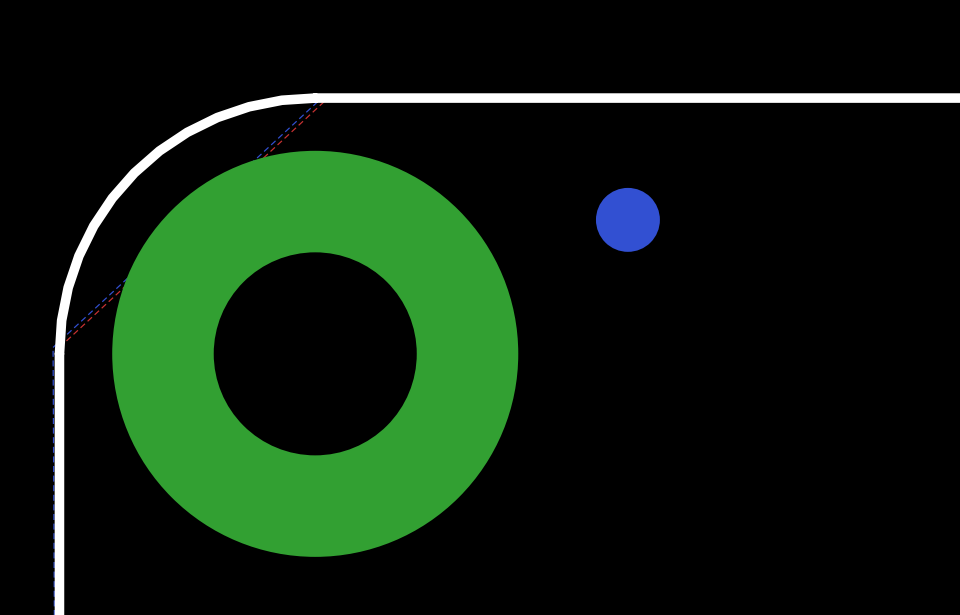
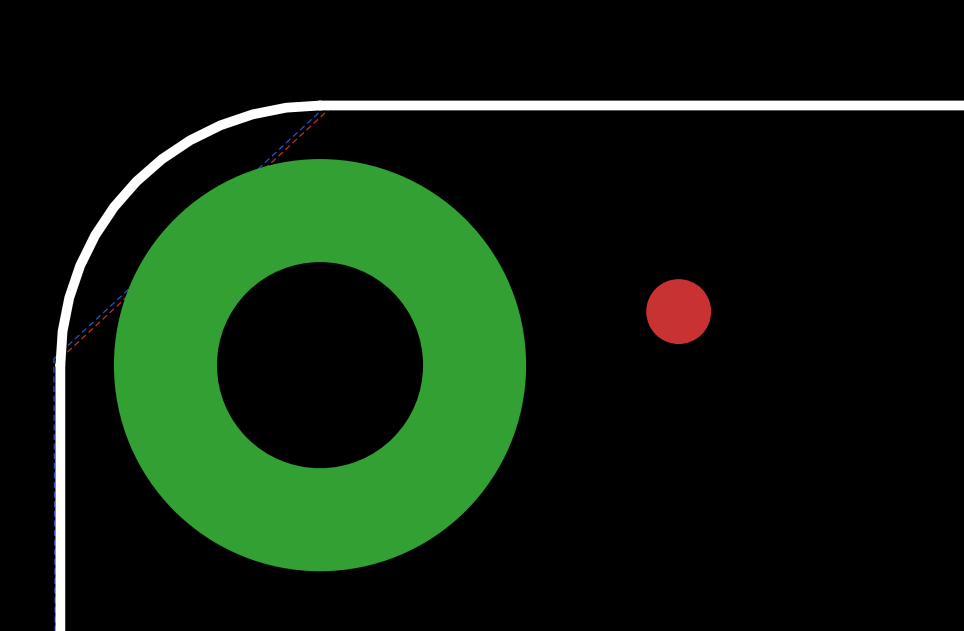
part: (627, 219) -> none
part: none -> (678, 311)

